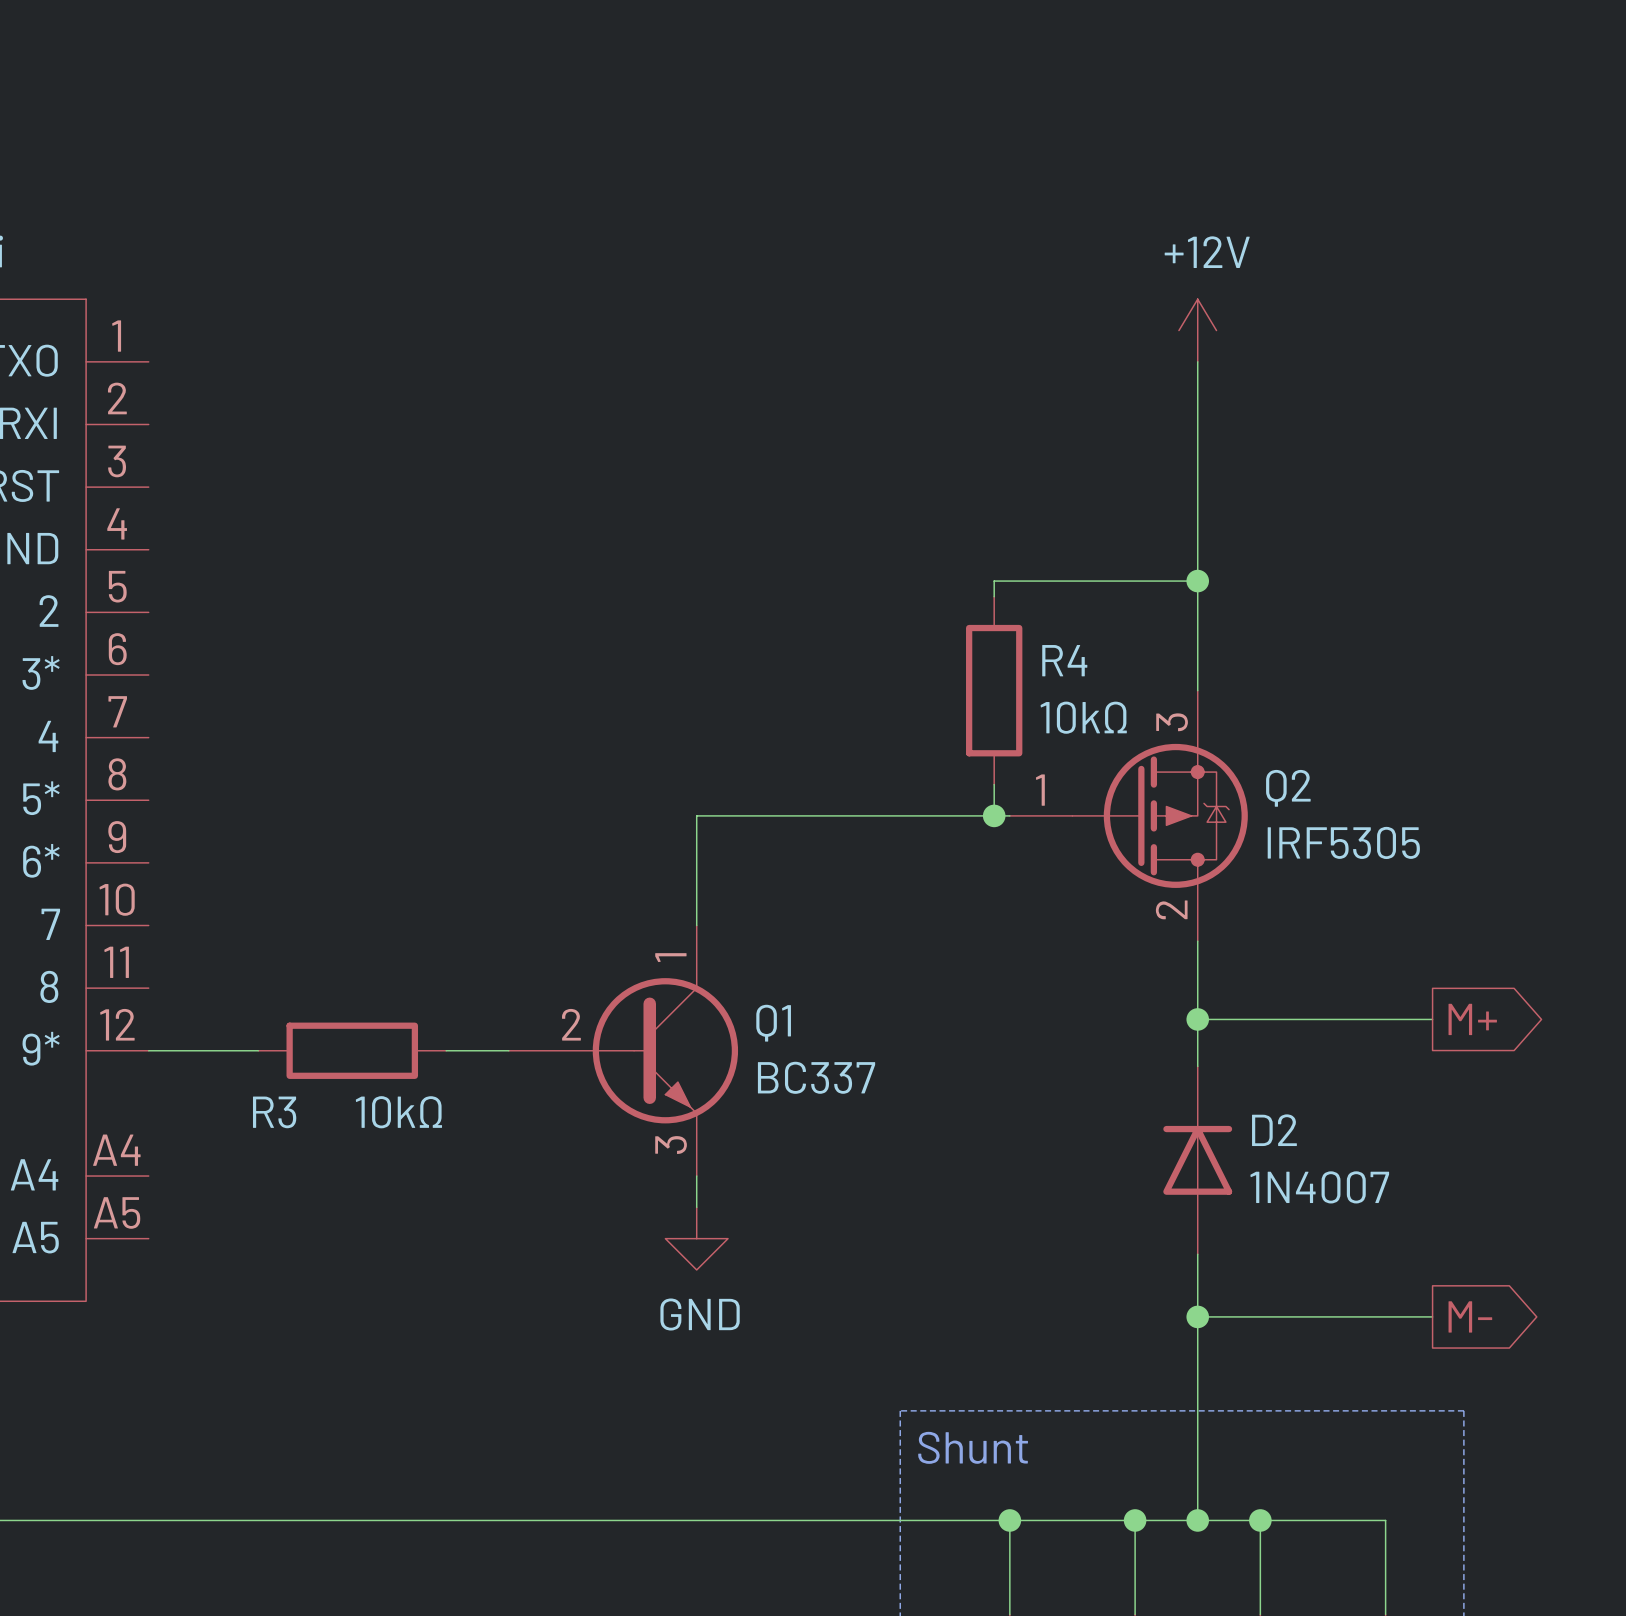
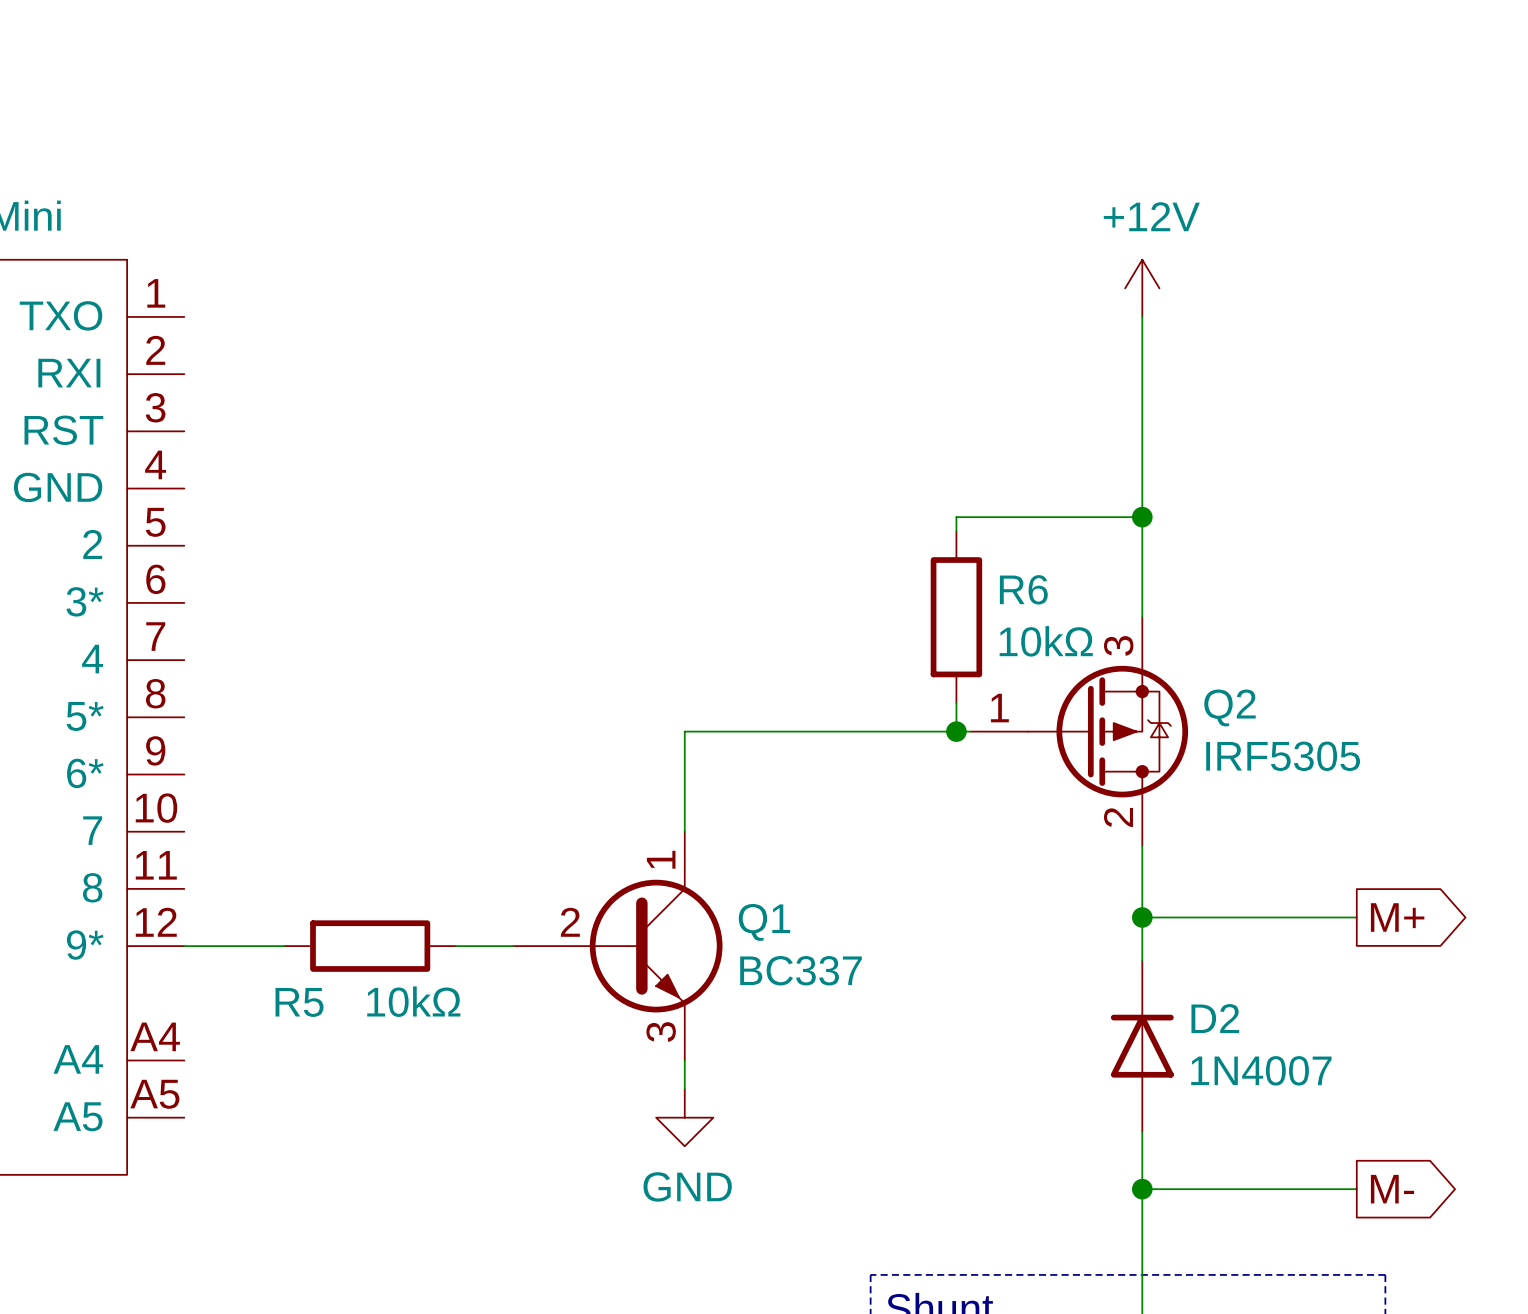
R4 name: R4 (1064, 660) -> R6 (1023, 589)
R3 name: R3 (274, 1112) -> R5 (299, 1002)

